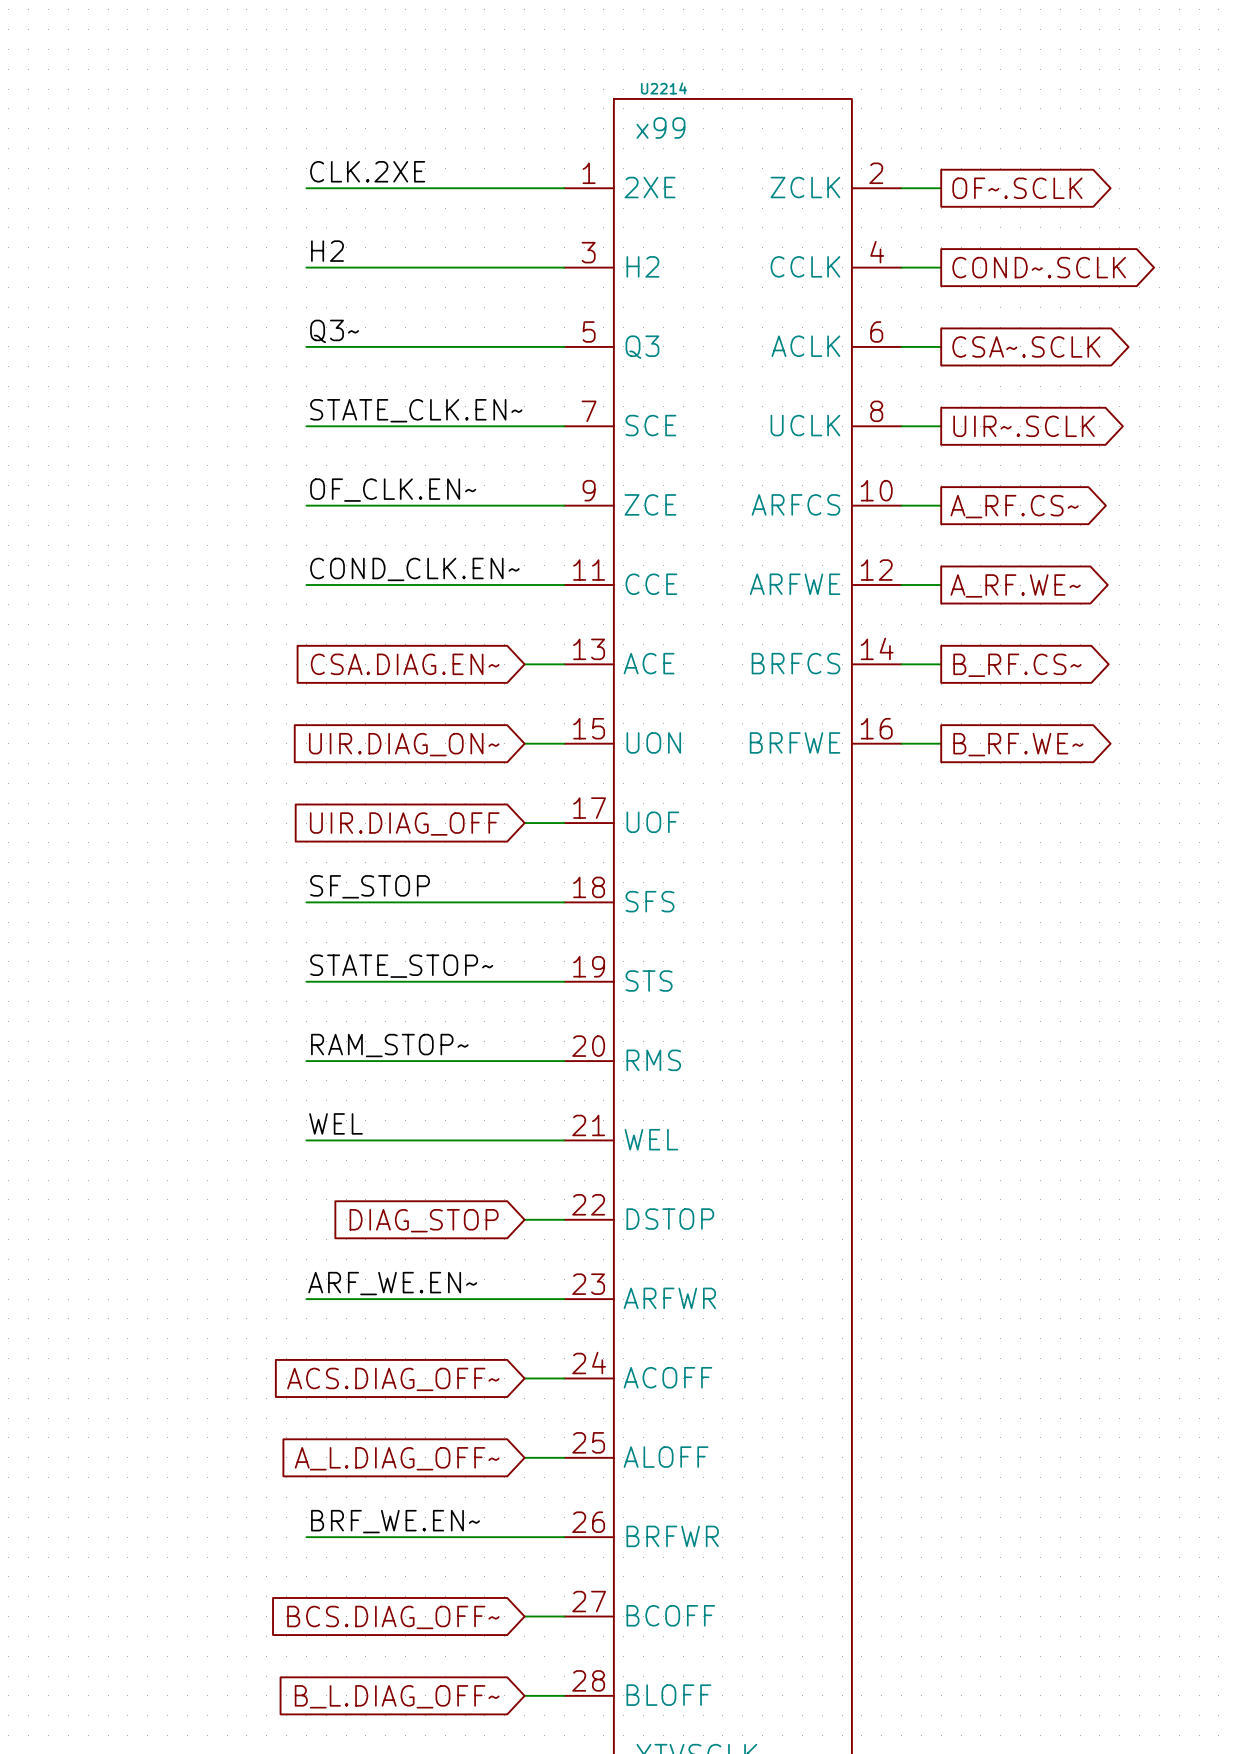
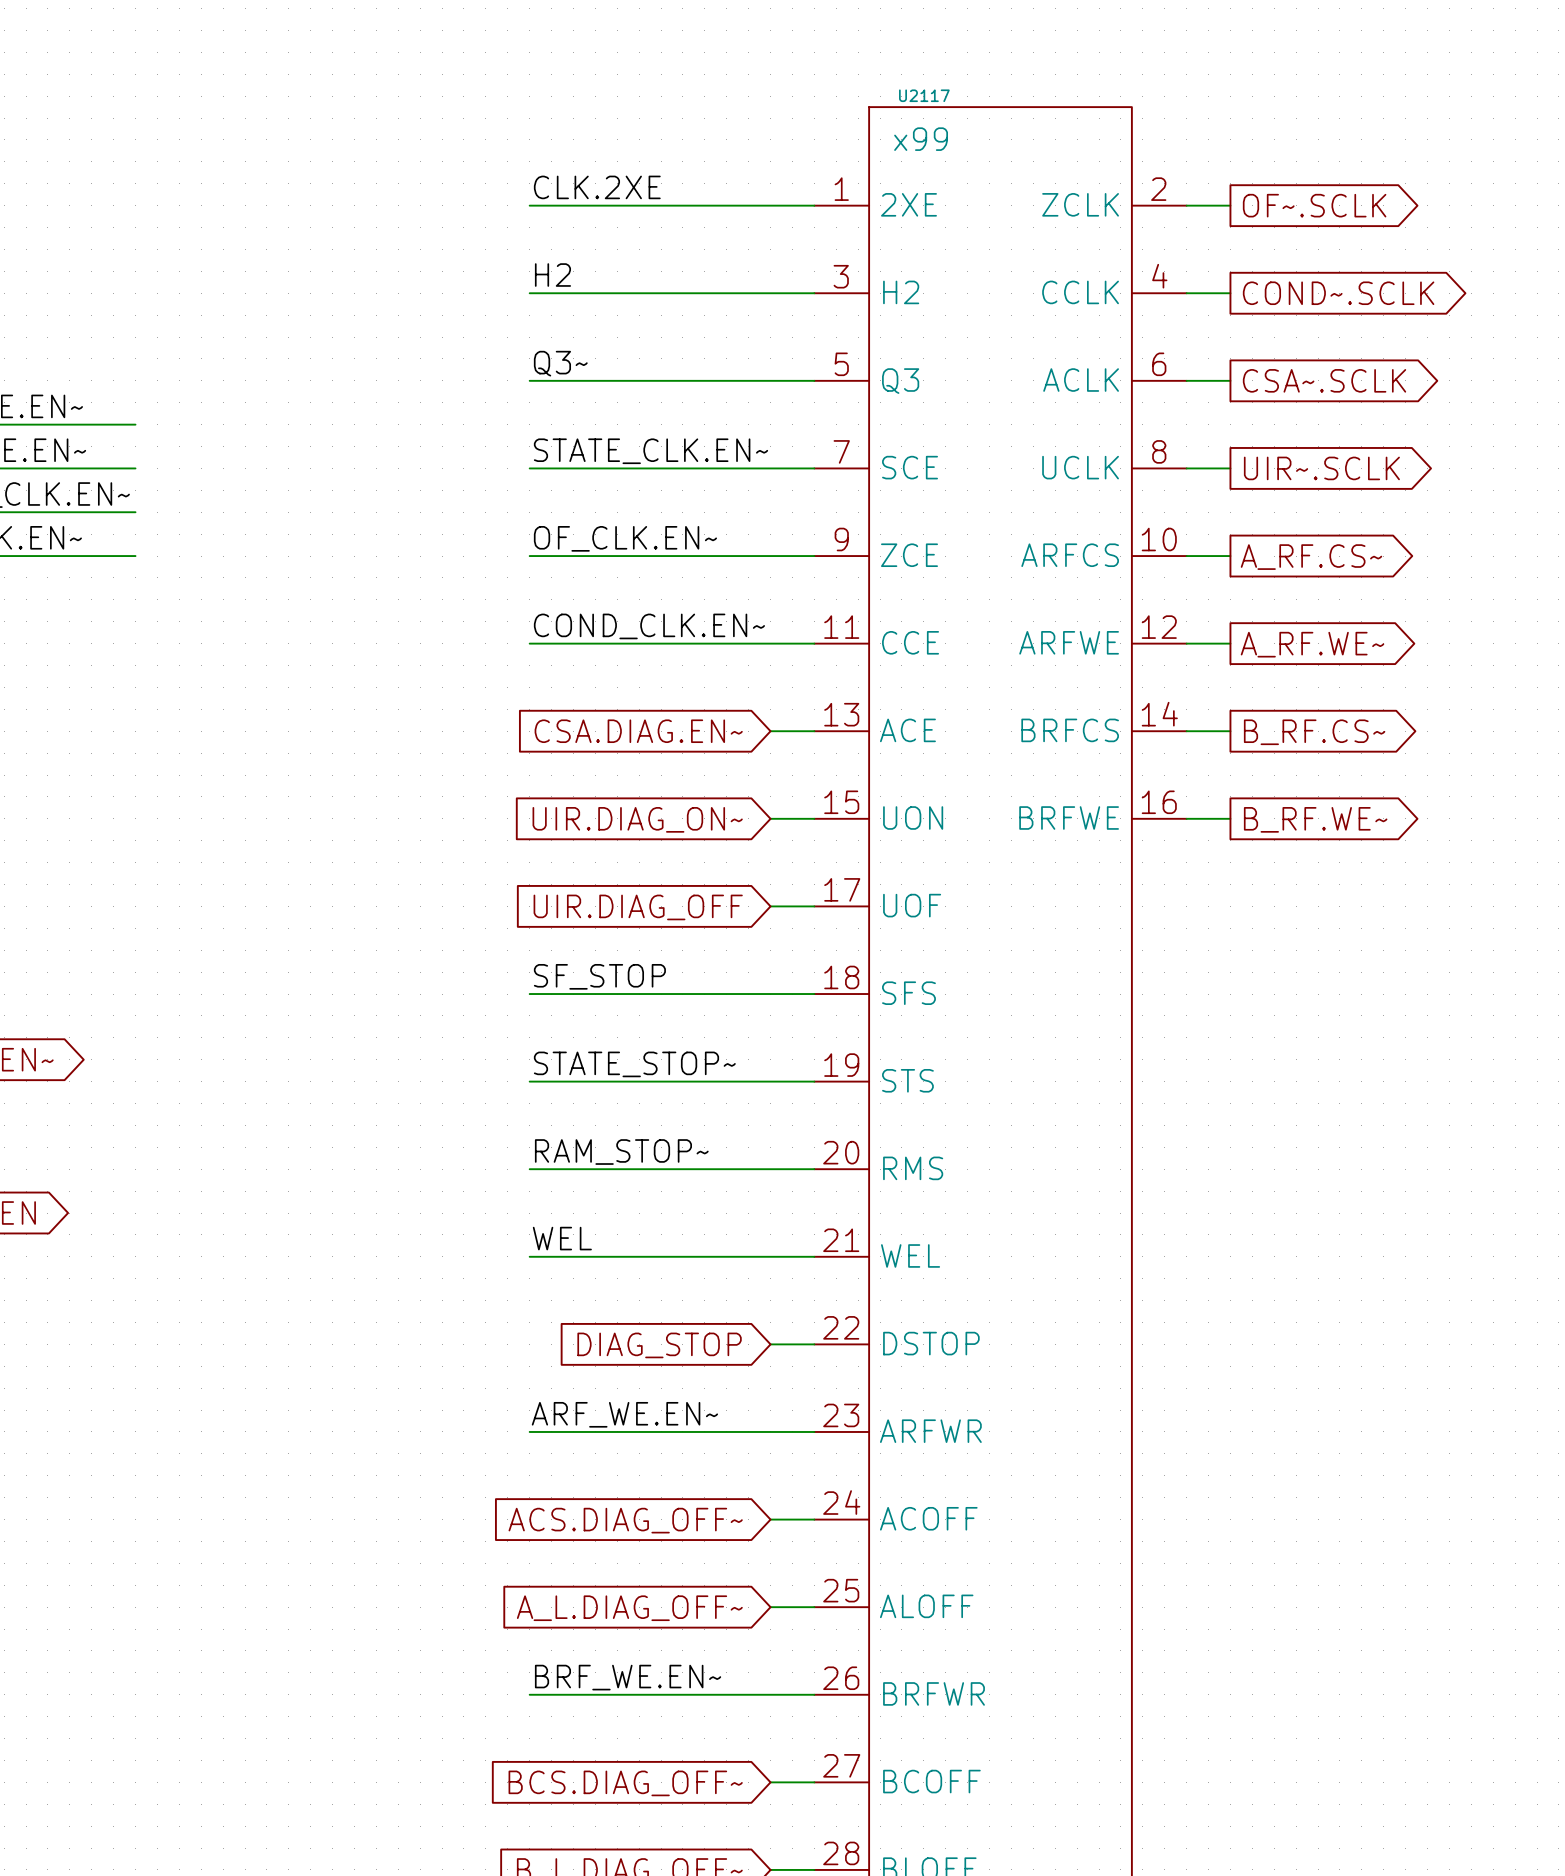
U2214 name: U2214 (663, 88) -> U2117 (924, 95)

